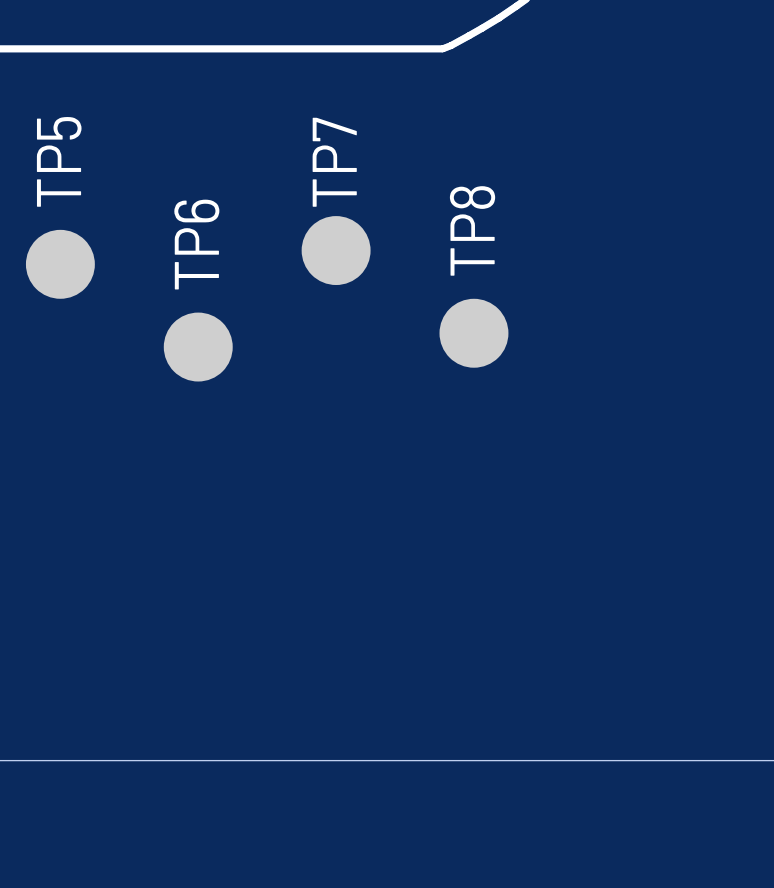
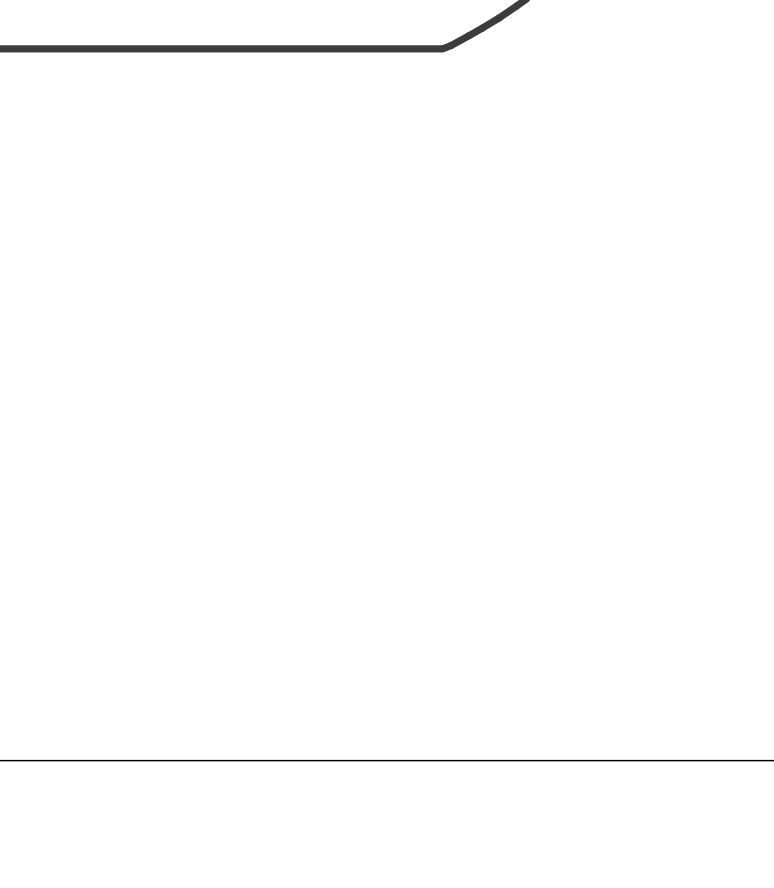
TP7: (336, 250) -> none
TP5: (60, 264) -> none
TP8: (473, 333) -> none
TP6: (198, 347) -> none

